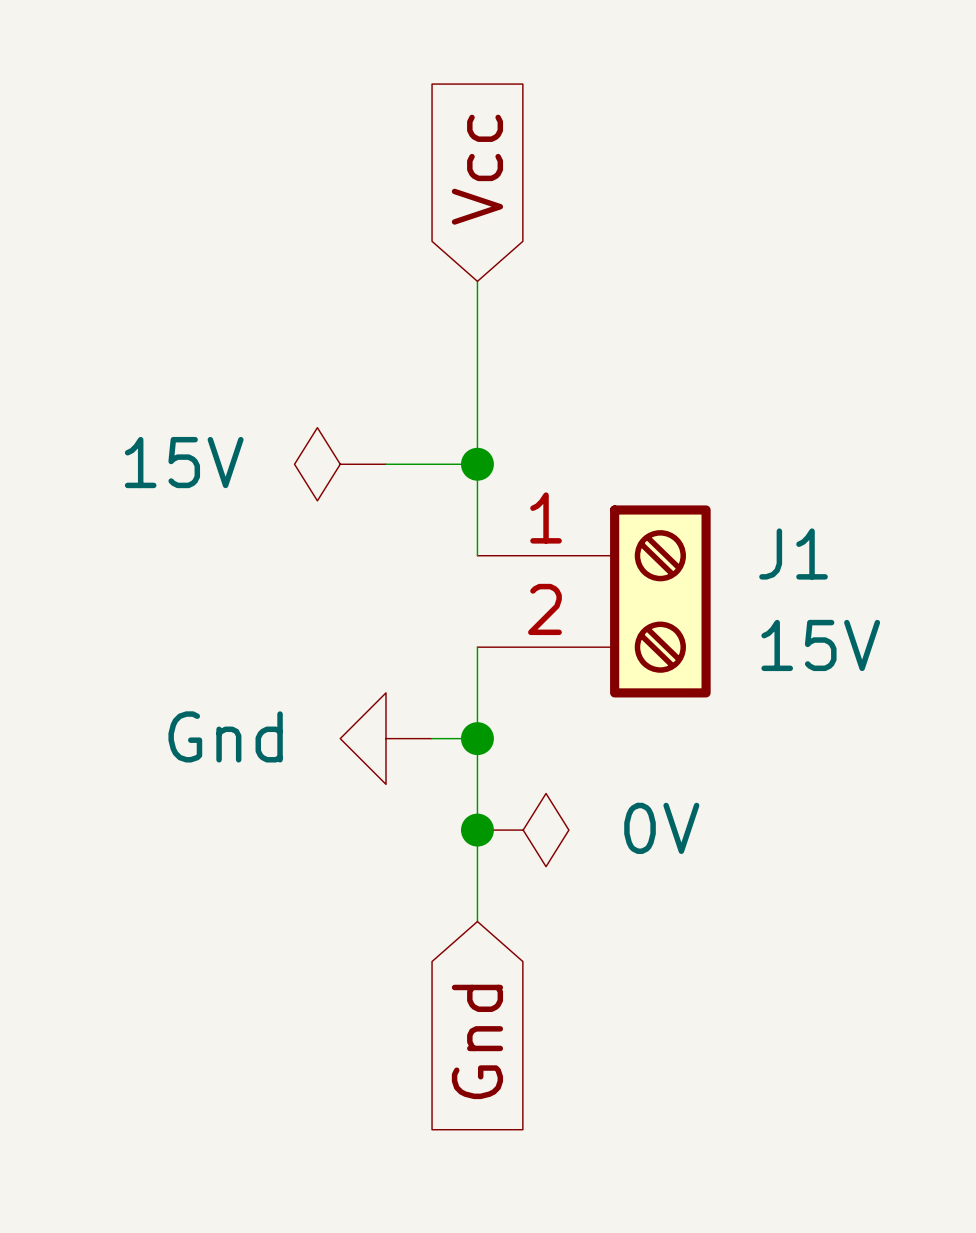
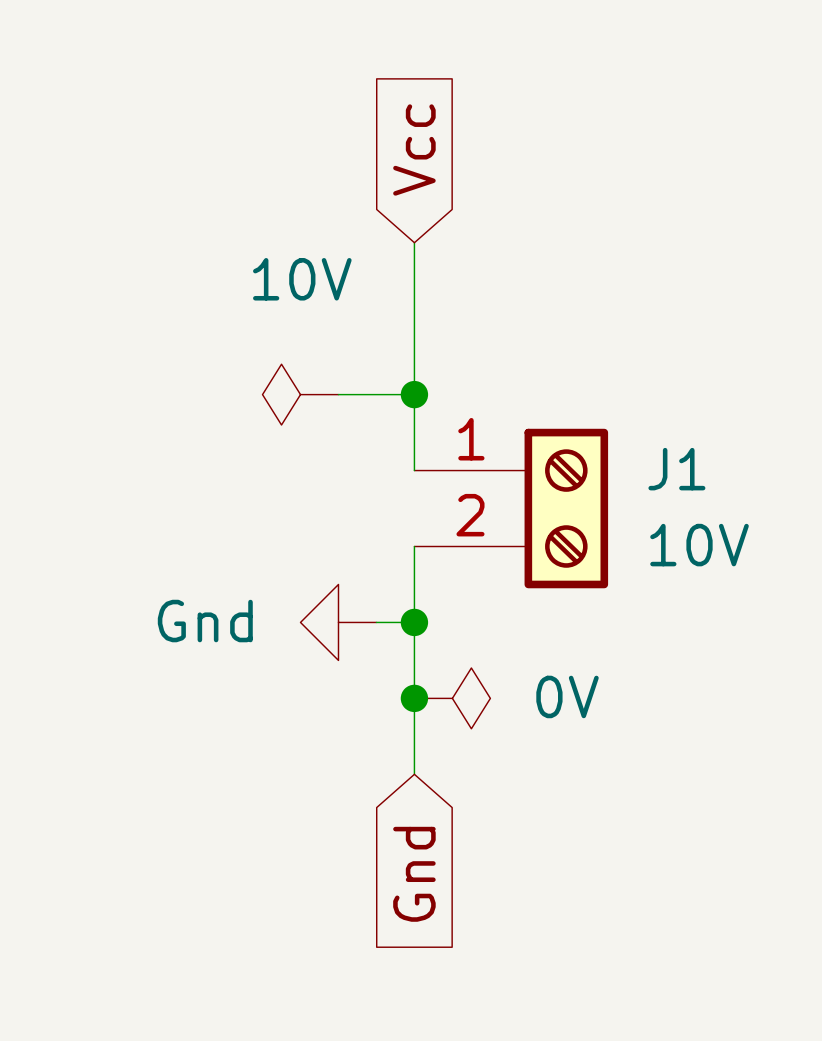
power symbol: 15V (340, 464) -> 10V (300, 394)
J1 value: 15V (820, 645) -> 10V (699, 545)

